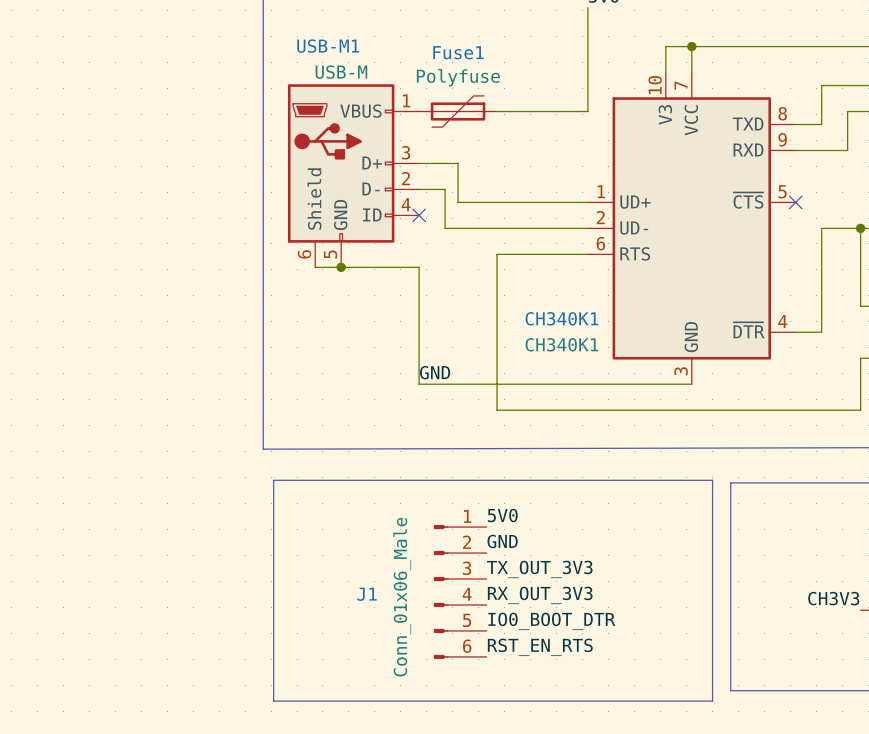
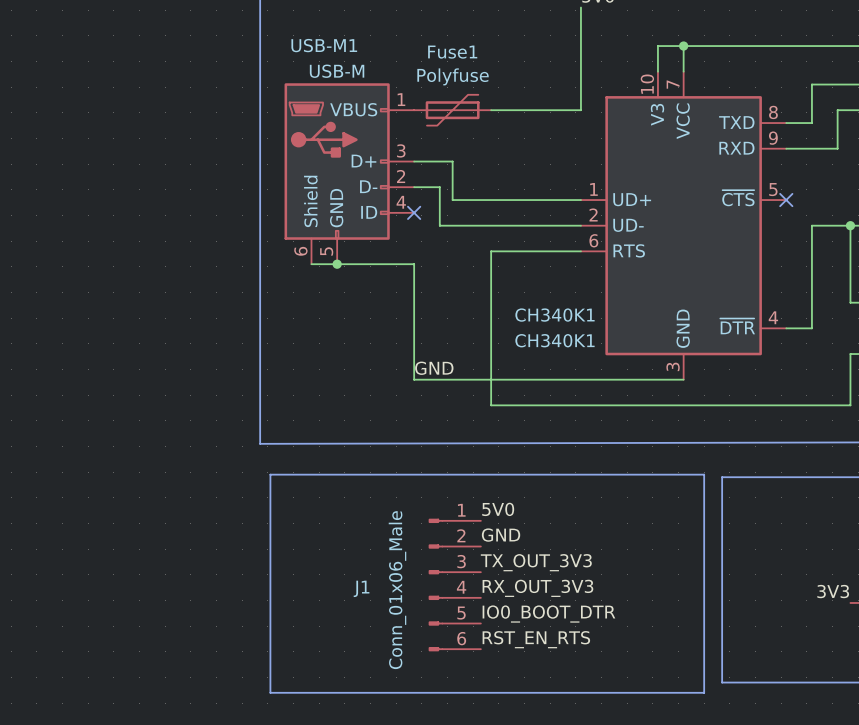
label: CH3V3 (833, 598) -> 3V3 (833, 591)

